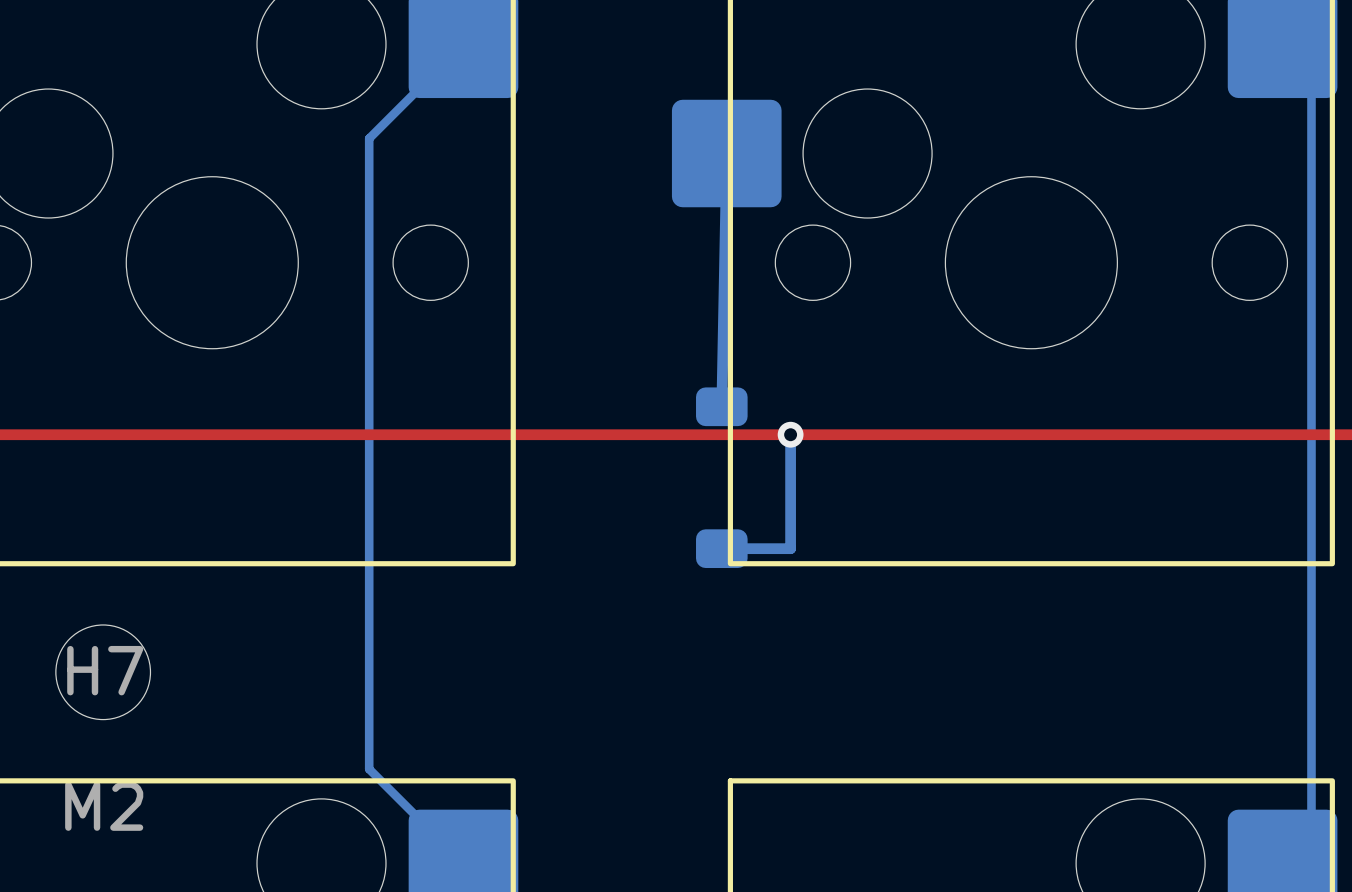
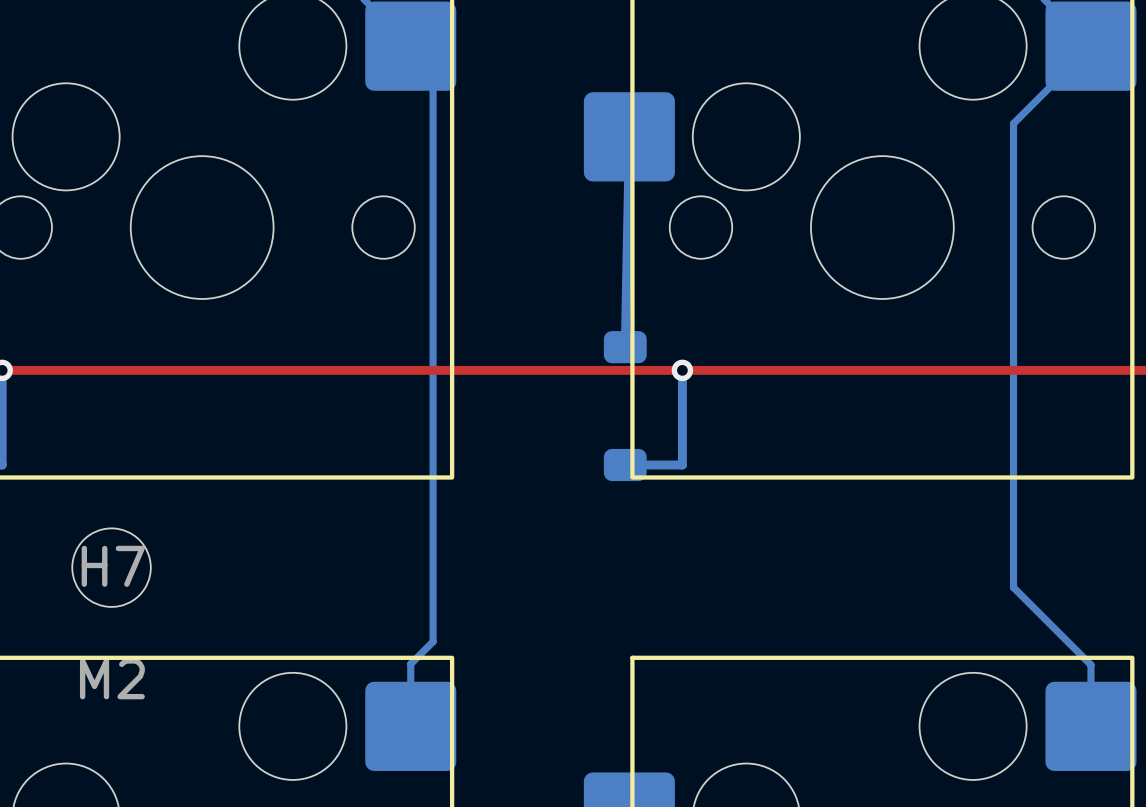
bottom track: (463, 44) (369, 138) (369, 769) (463, 863) -> (410, 46) (433, 68) (433, 641) (410, 664) (410, 726)
bottom track: (1282, 44) (1311, 73) (1311, 834) (1282, 863) -> (1090, 46) (1013, 123) (1013, 587) (1090, 664) (1090, 726)

